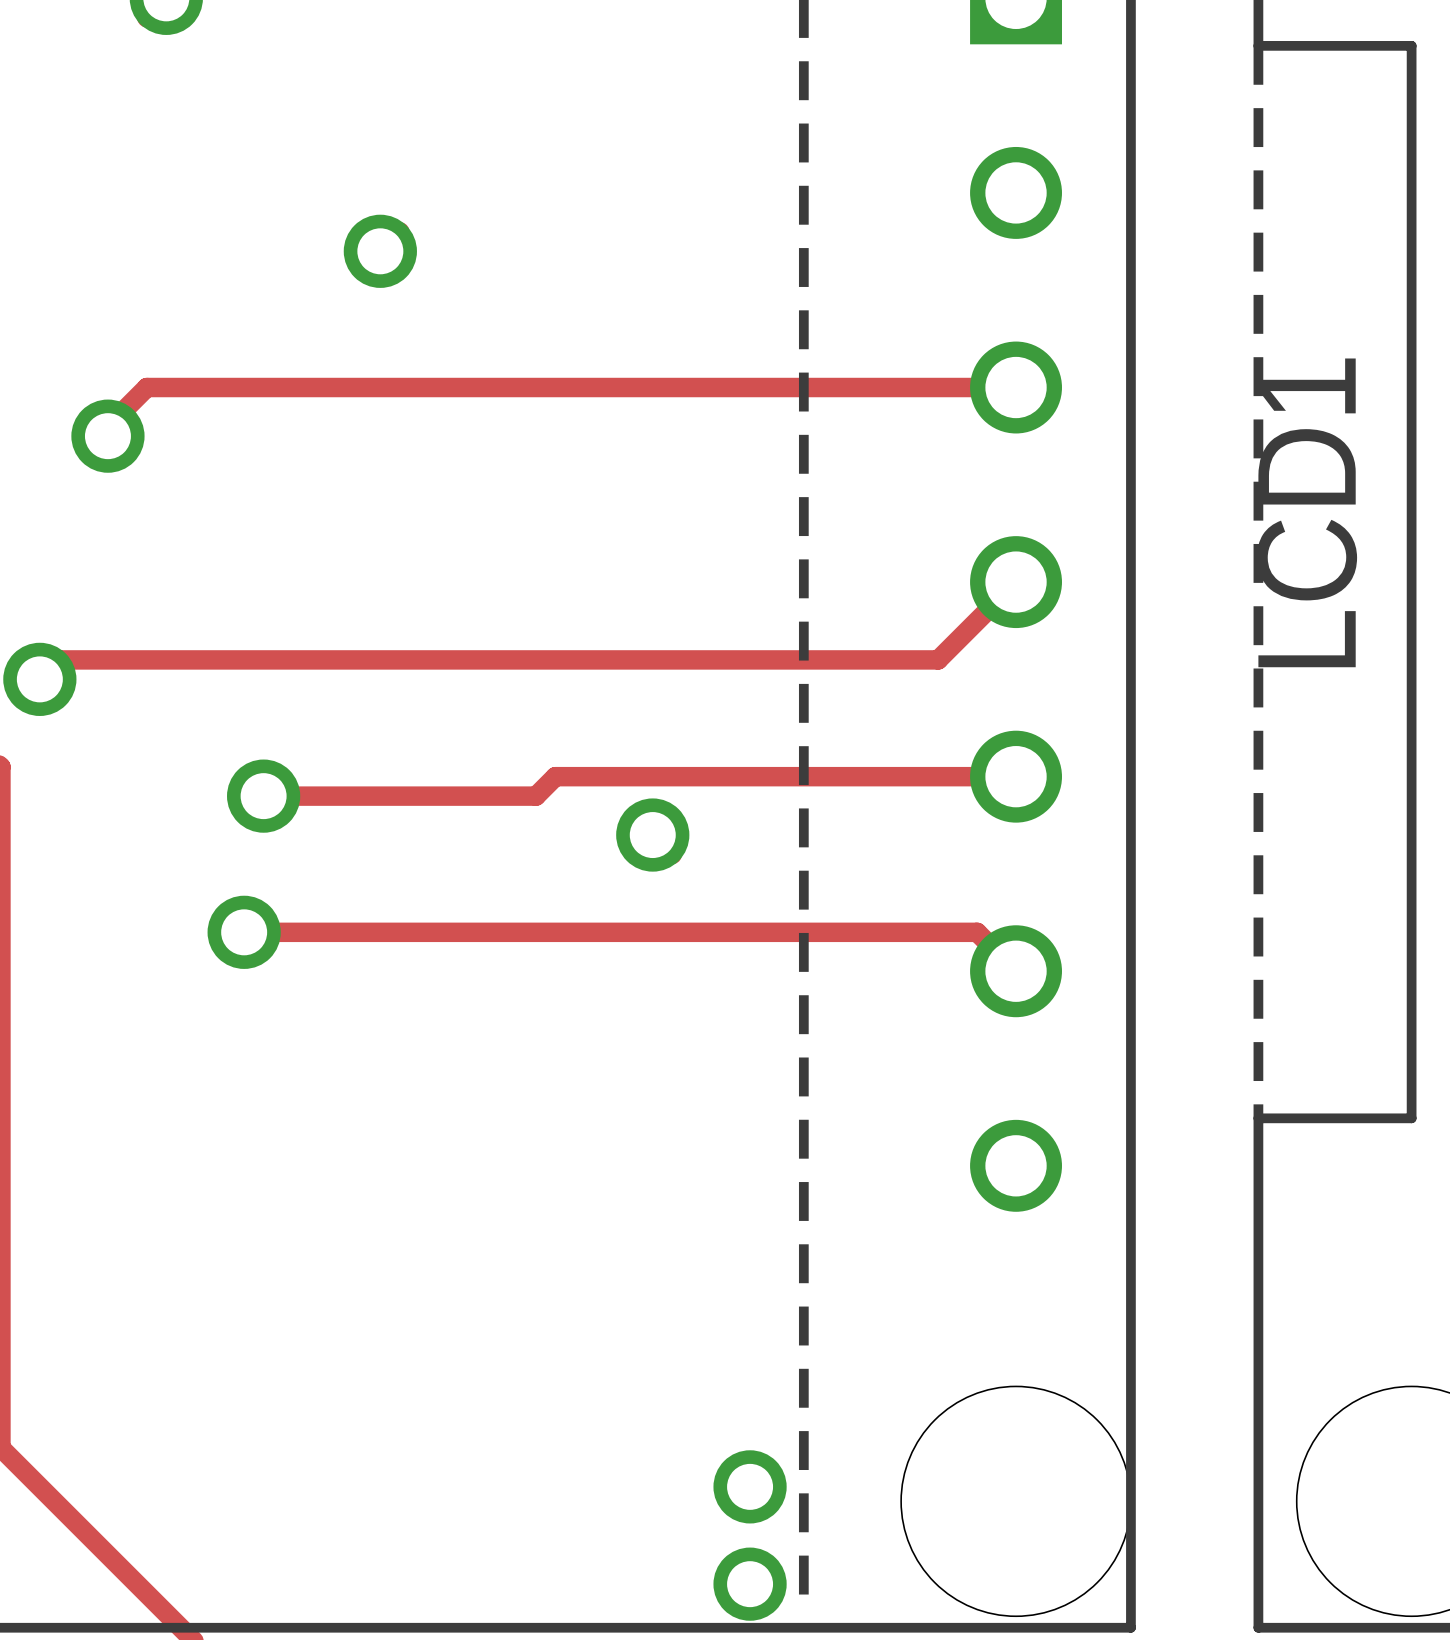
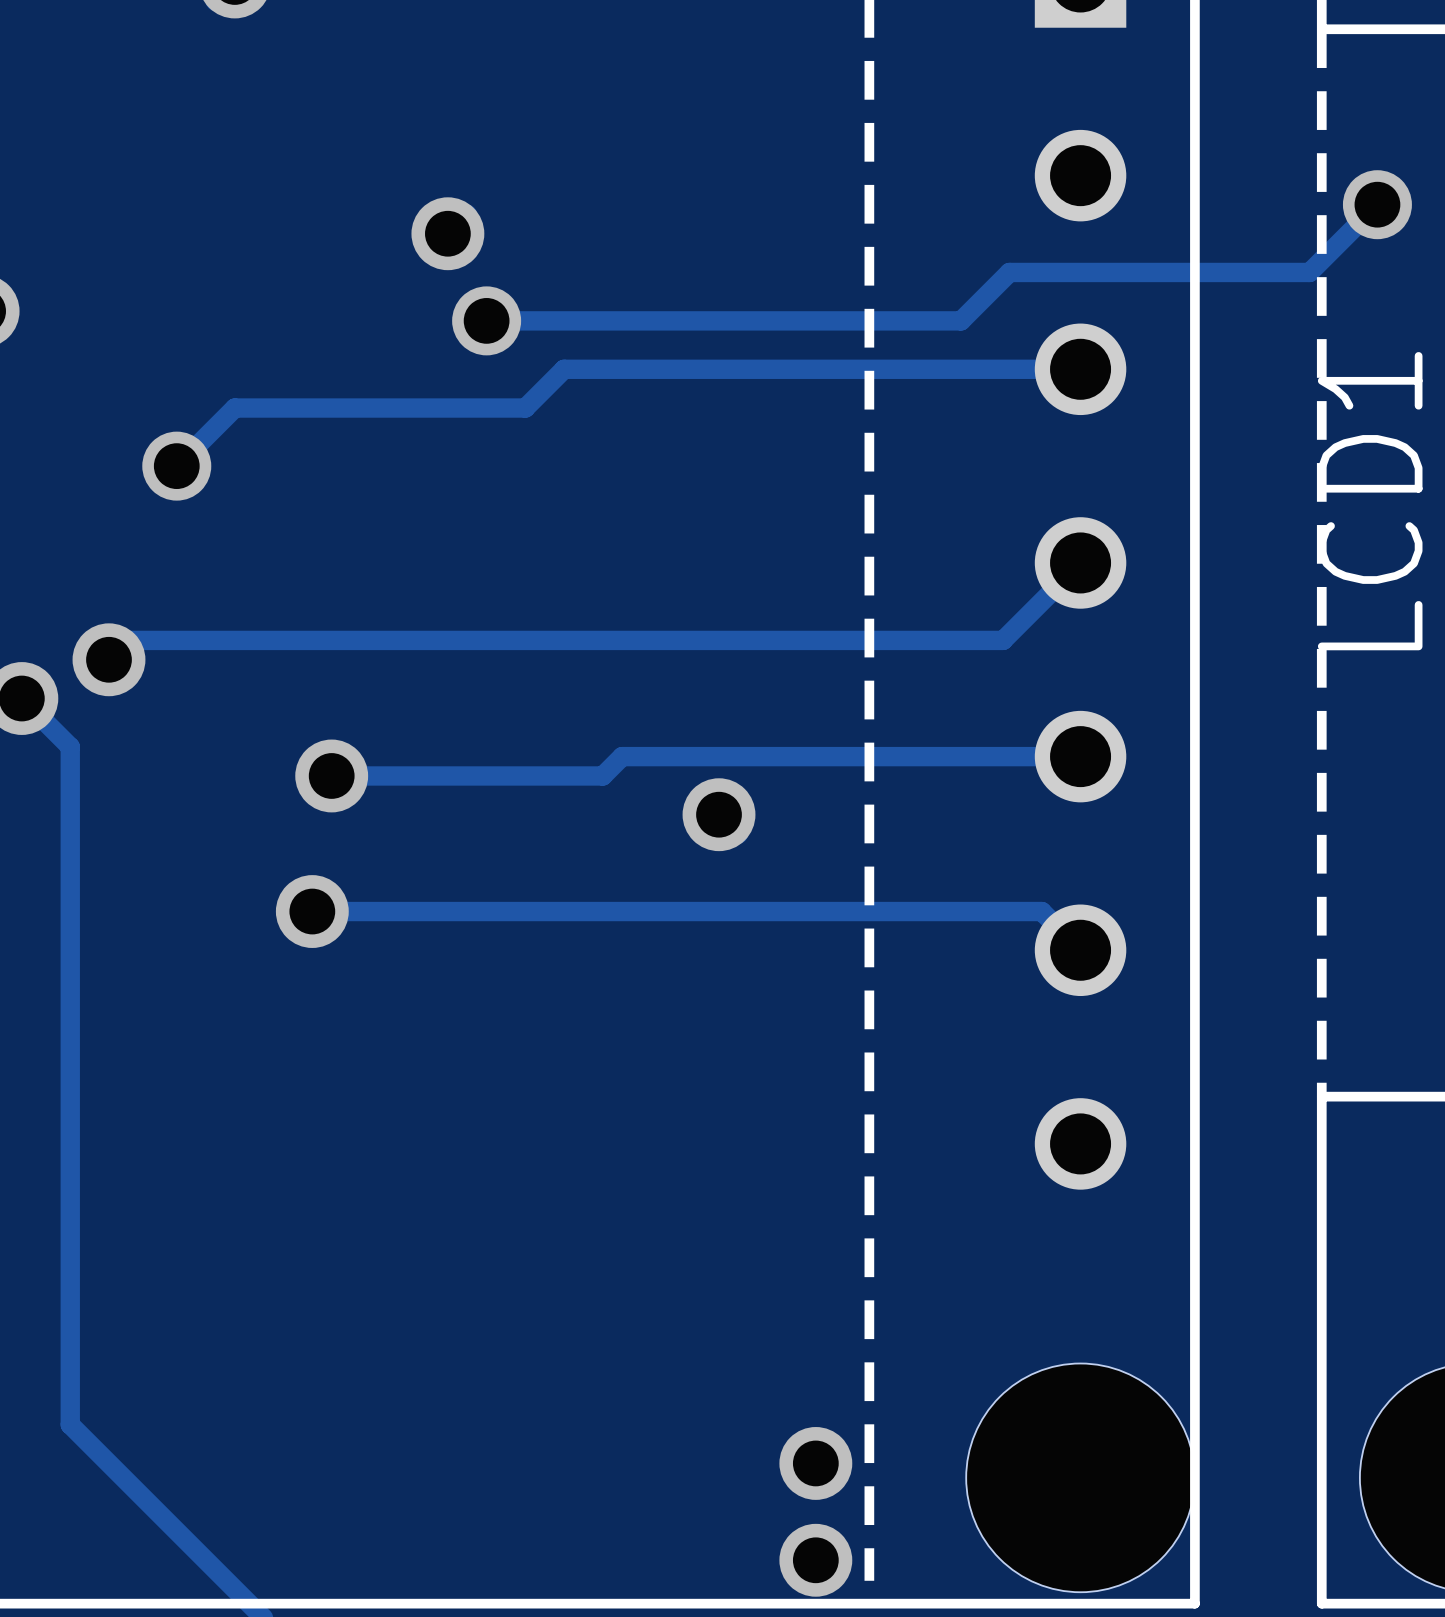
track: none -> (1377, 204) (1309, 272) (1009, 272) (961, 320) (486, 320)
via: none -> (1377, 204)
via: none -> (486, 320)
track: (497, 387) (146, 387) (107, 426) (107, 436) -> (564, 369) (525, 408) (234, 408) (176, 466)
via position: (107, 436) -> (176, 466)

